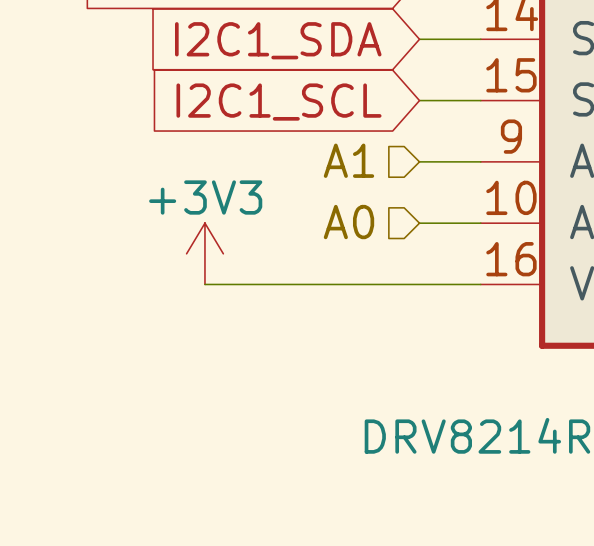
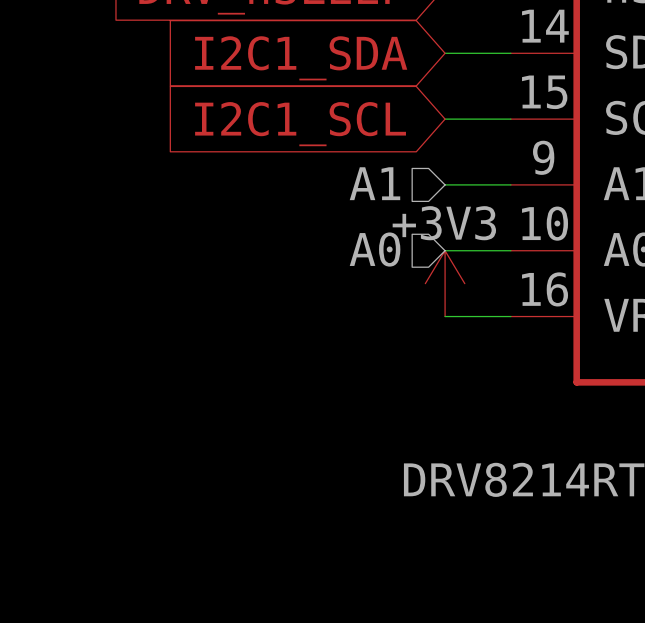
power symbol position: +3V3 (204, 253) -> +3V3 (445, 283)
wire: (204, 284) (419, 284) -> none

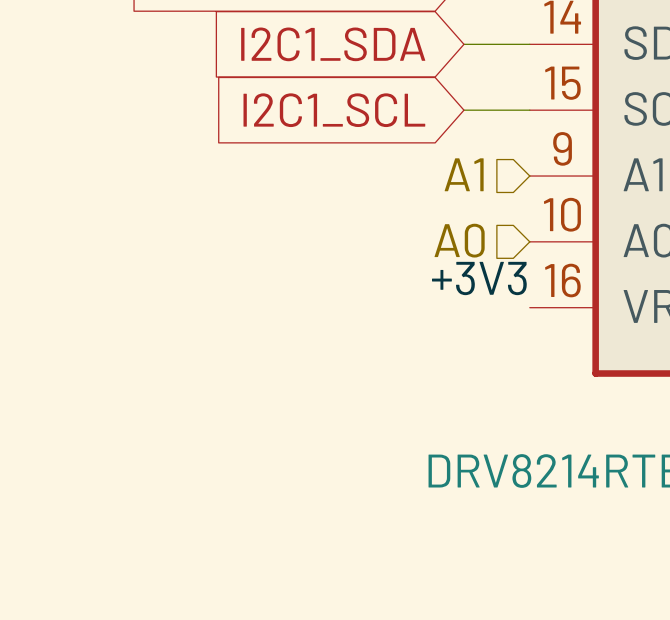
hierarchical label position: A1 (374, 183) -> A1 (464, 174)
wire: (445, 184) (510, 184) -> none
hierarchical label position: A0 (375, 249) -> A0 (459, 240)
wire: (445, 250) (510, 250) -> none
power symbol: +3V3 (445, 283) -> none
label: none -> +3V3 (479, 278)
wire: (445, 316) (510, 316) -> none

